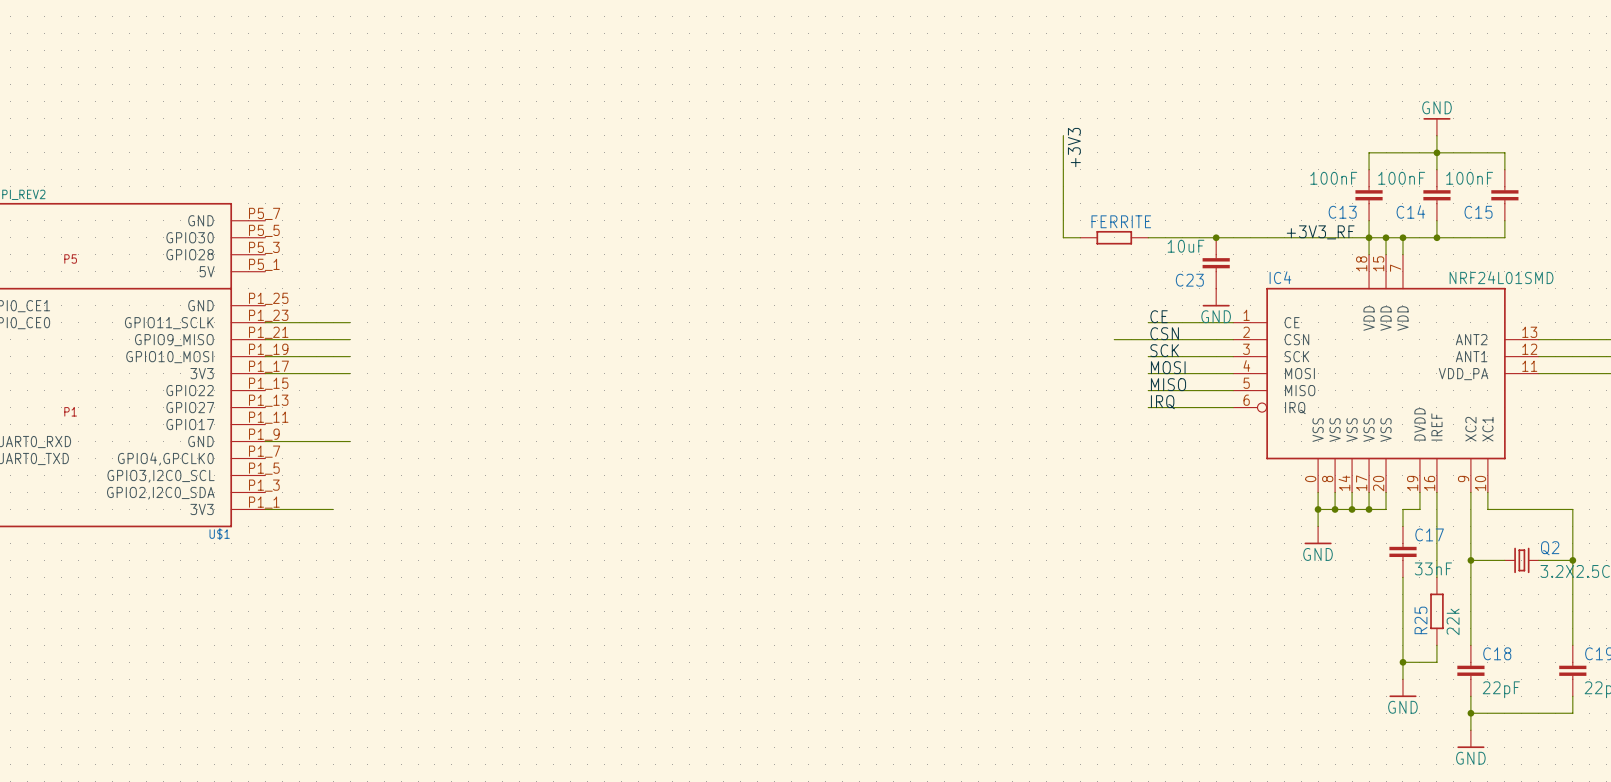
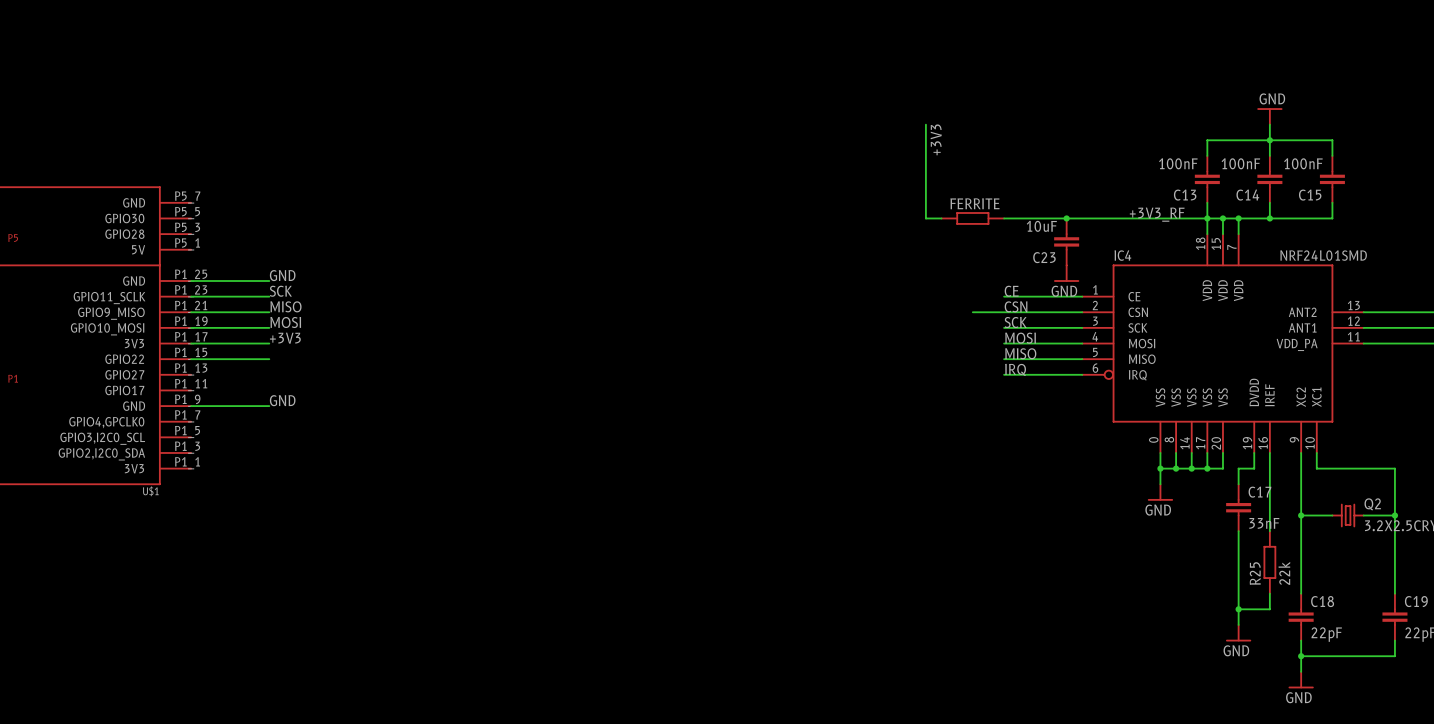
label: none -> GND (282, 275)
wire: none -> (191, 281) (269, 281)
label: none -> SCK (280, 291)
label: none -> MISO (285, 306)
label: none -> MOSI (285, 322)
label: none -> +3V3 (285, 338)
wire: none -> (191, 359) (269, 359)
label: none -> GND (282, 400)
wire: (265, 509) (333, 509) -> none

